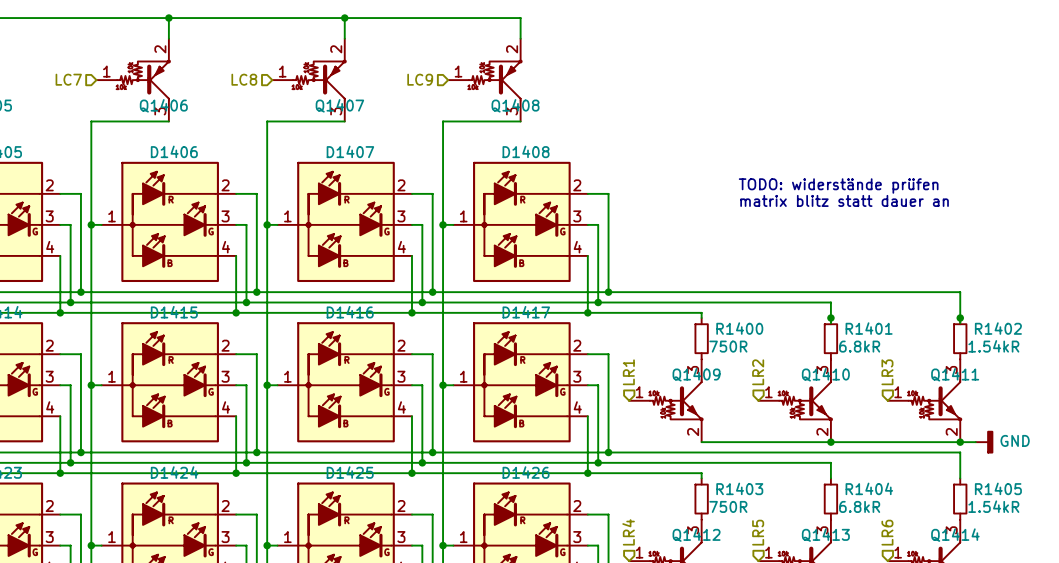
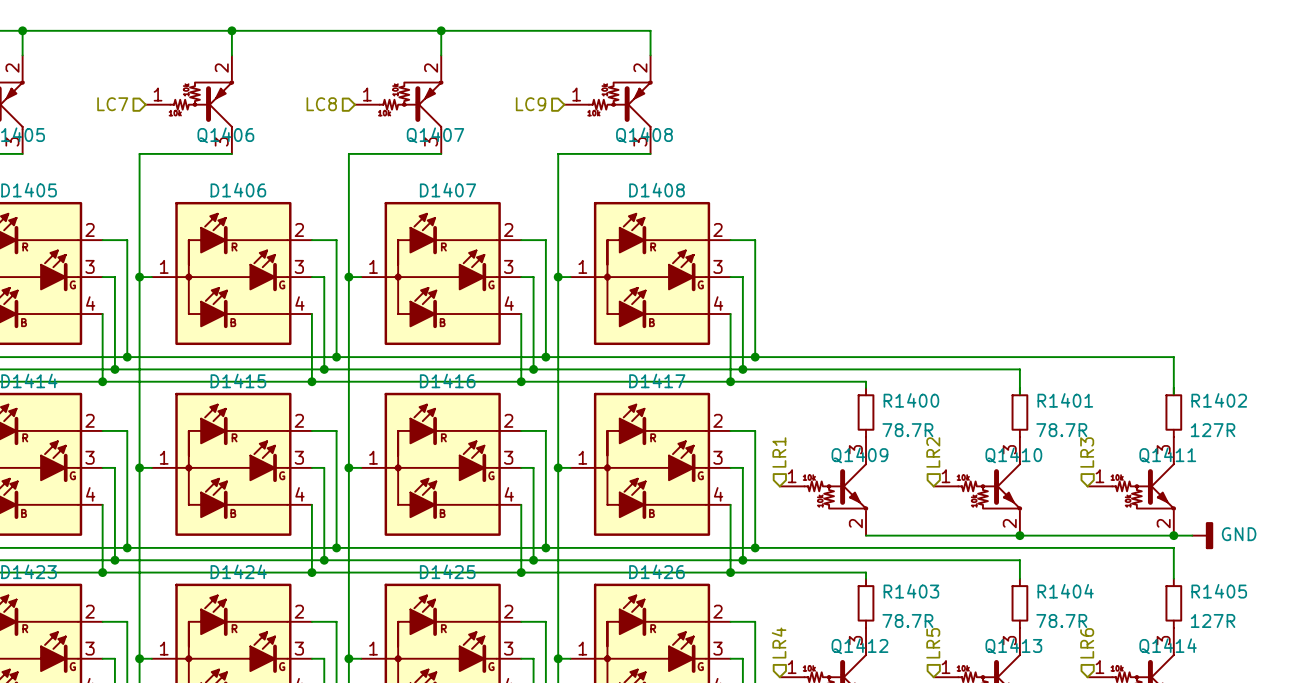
text: TODO: widerstände prüfen (838, 185) -> none
text: matrix blitz statt dauer an (844, 200) -> none
junction: (830, 318) -> none
junction: (960, 318) -> none
R1400 value: 750R (728, 346) -> 78.7R (907, 430)
R1401 value: 6.8kR (859, 346) -> 78.7R (1061, 430)
R1402 value: 1.54kR (993, 346) -> 127R (1213, 430)
R1403 value: 750R (728, 506) -> 78.7R (907, 620)
R1404 value: 6.8kR (859, 506) -> 78.7R (1061, 620)
R1405 value: 1.54kR (993, 506) -> 127R (1213, 620)

